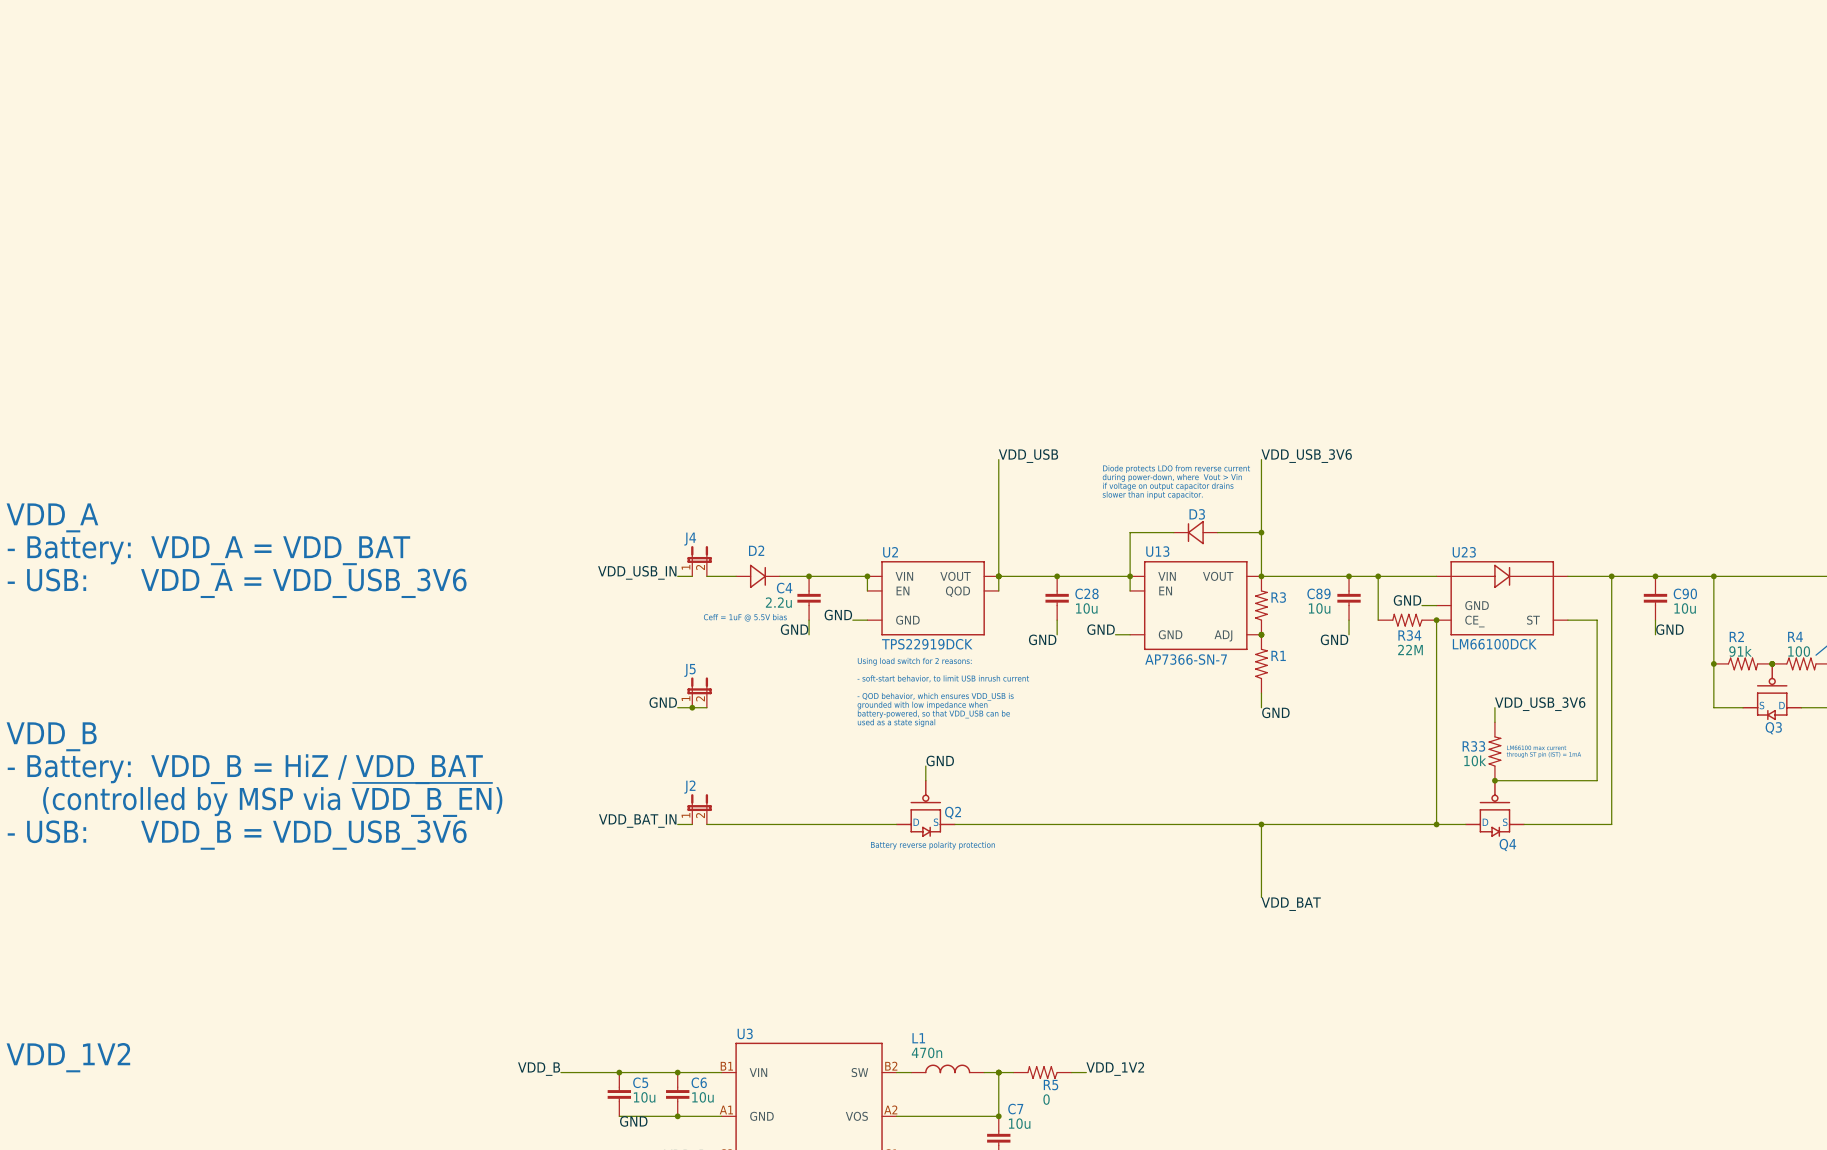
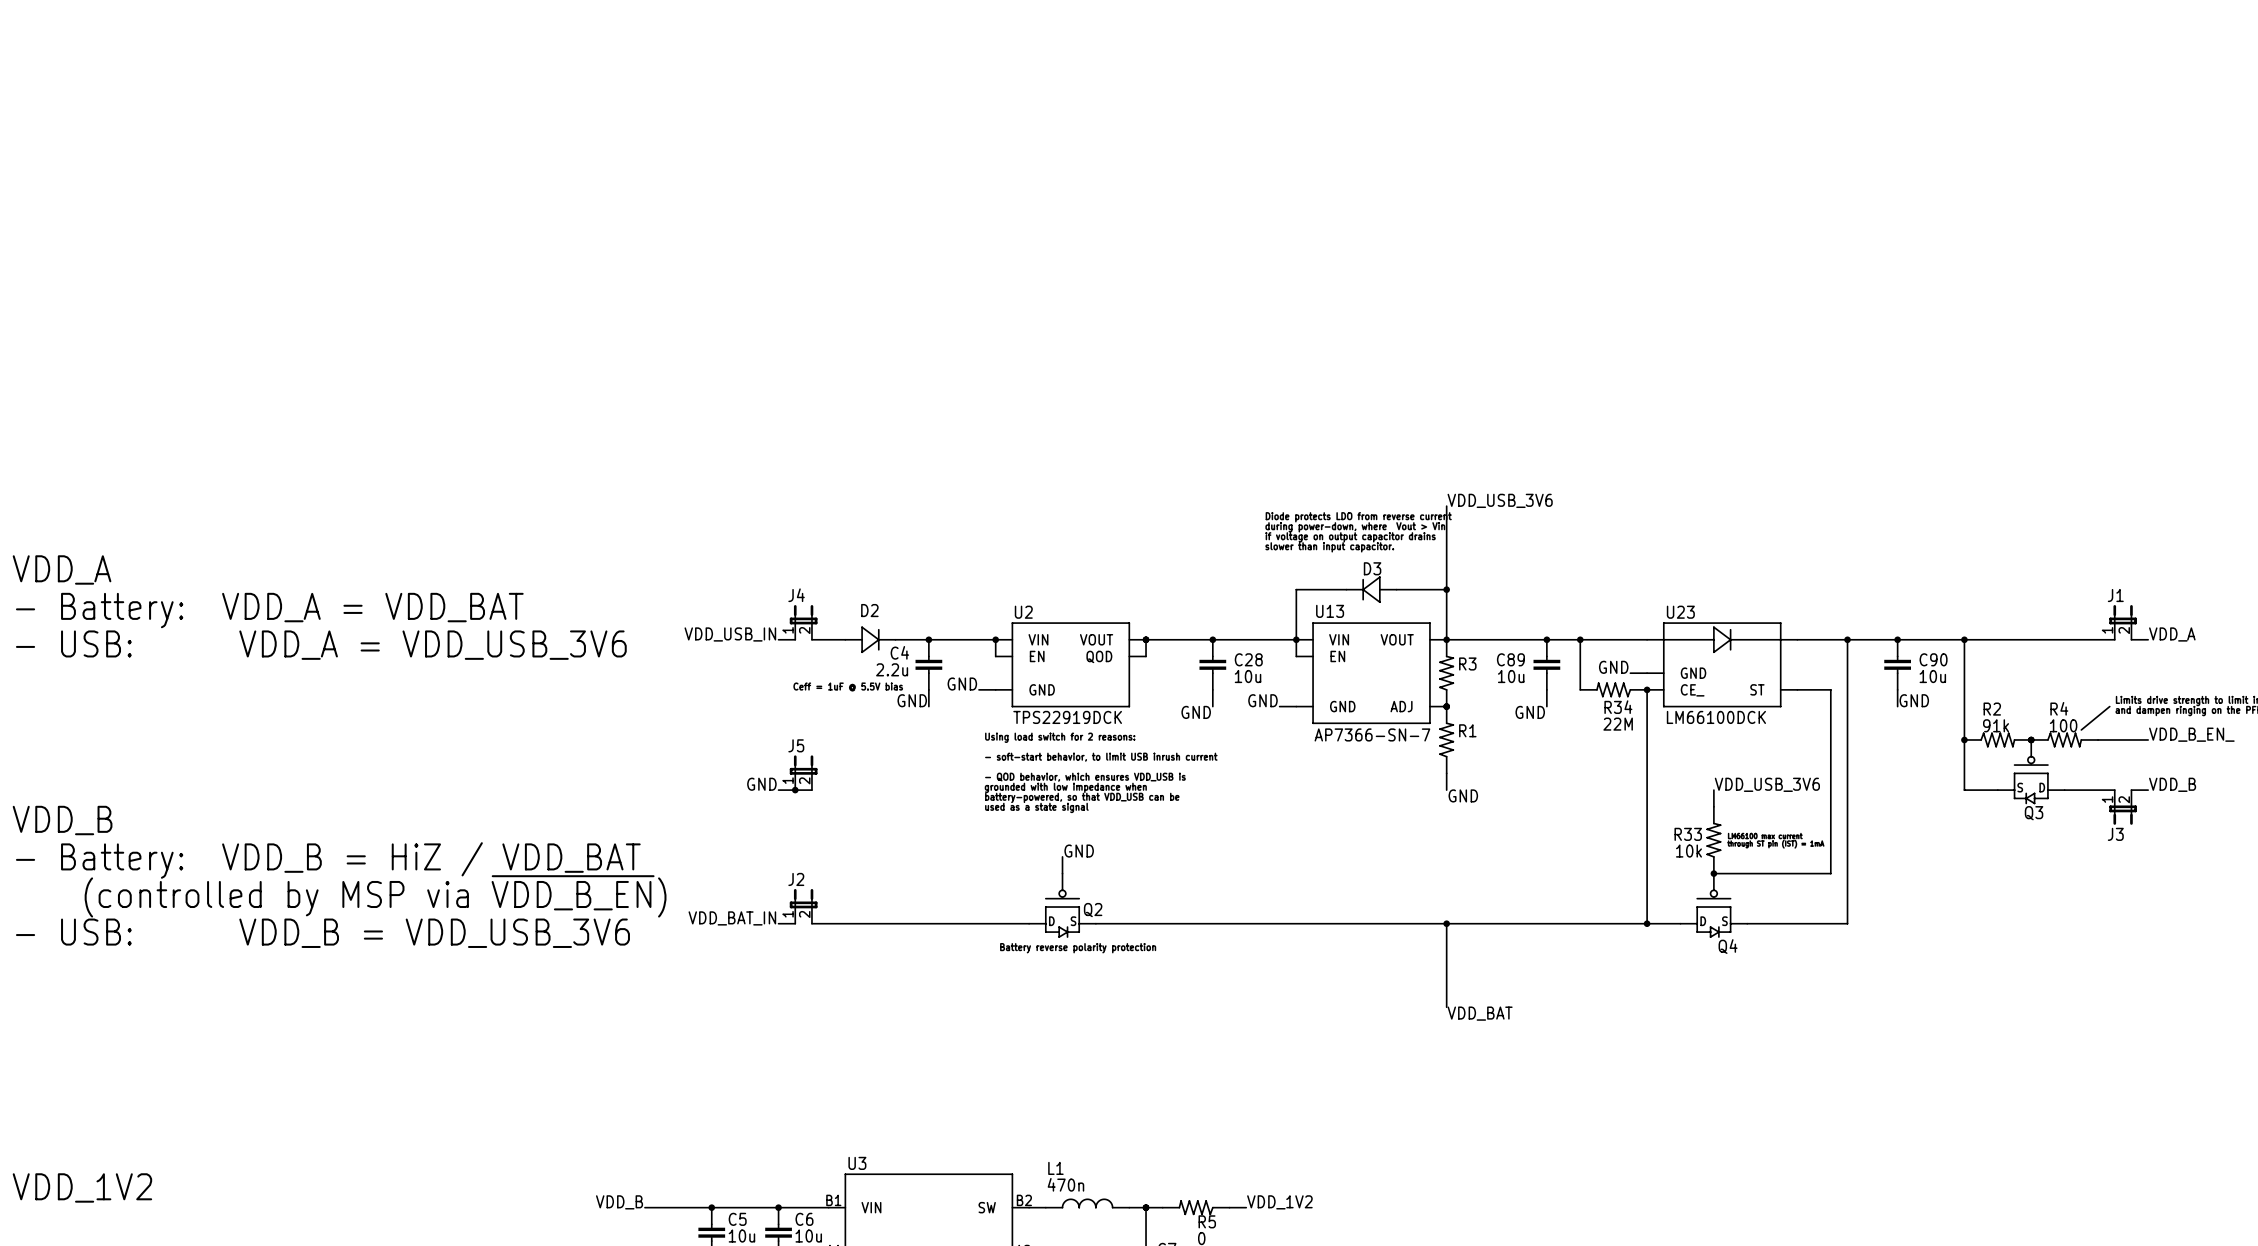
label: VDD_USB (1028, 456) -> none
wire: (998, 459) (998, 576) -> none

